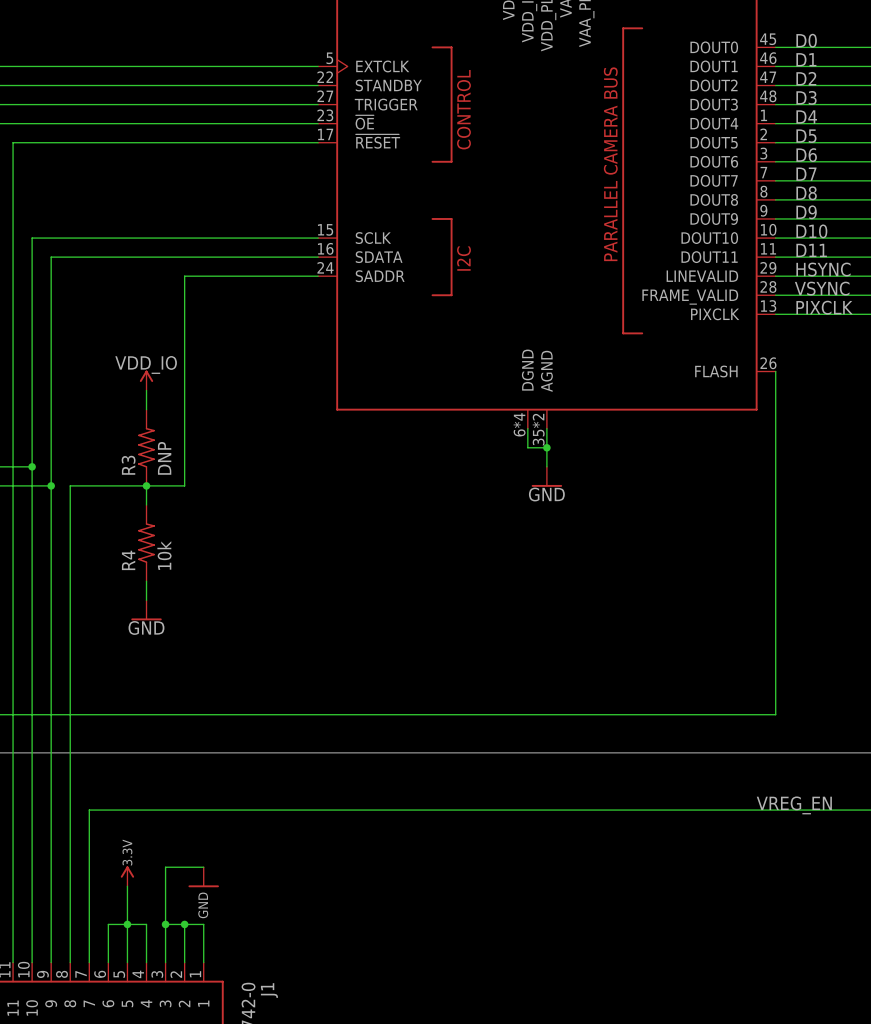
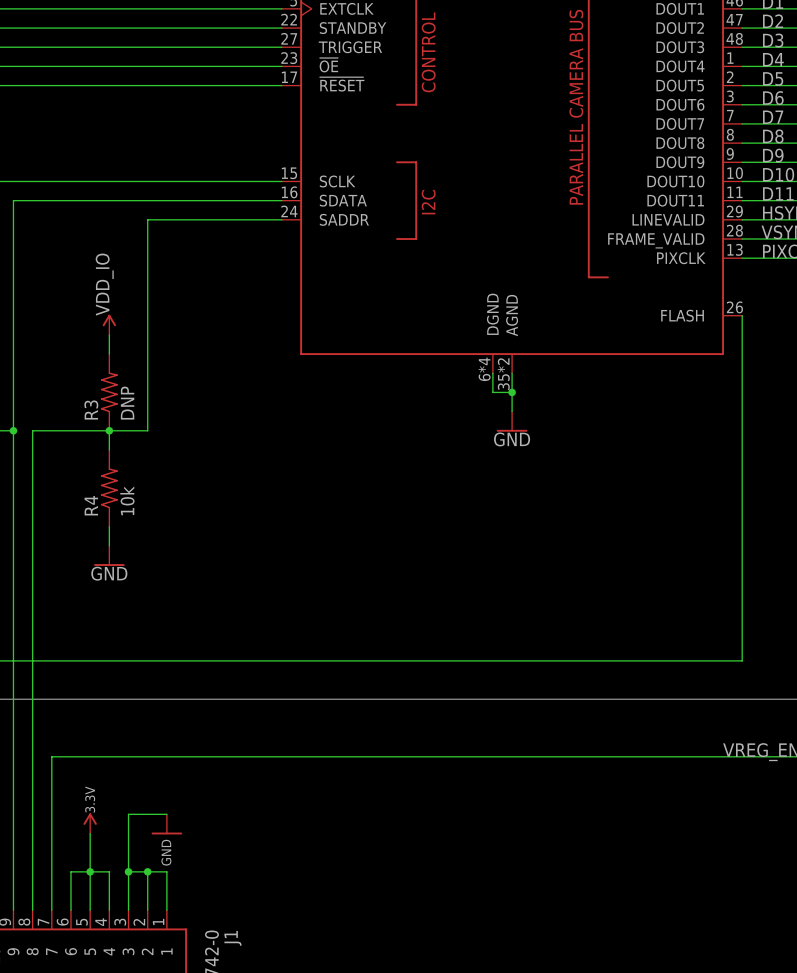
label: none -> VDD_IO (104, 284)
power symbol text: VDD_IO (146, 364) -> none

